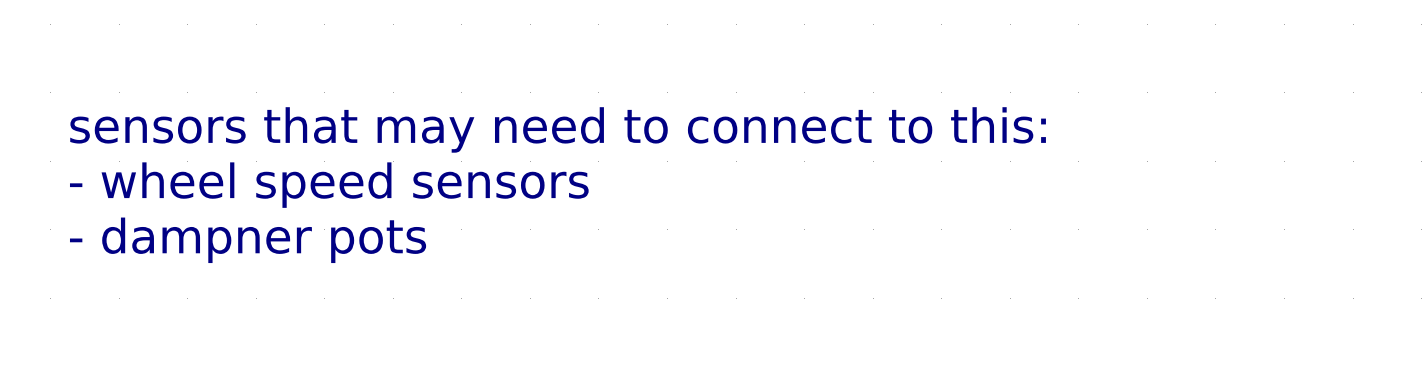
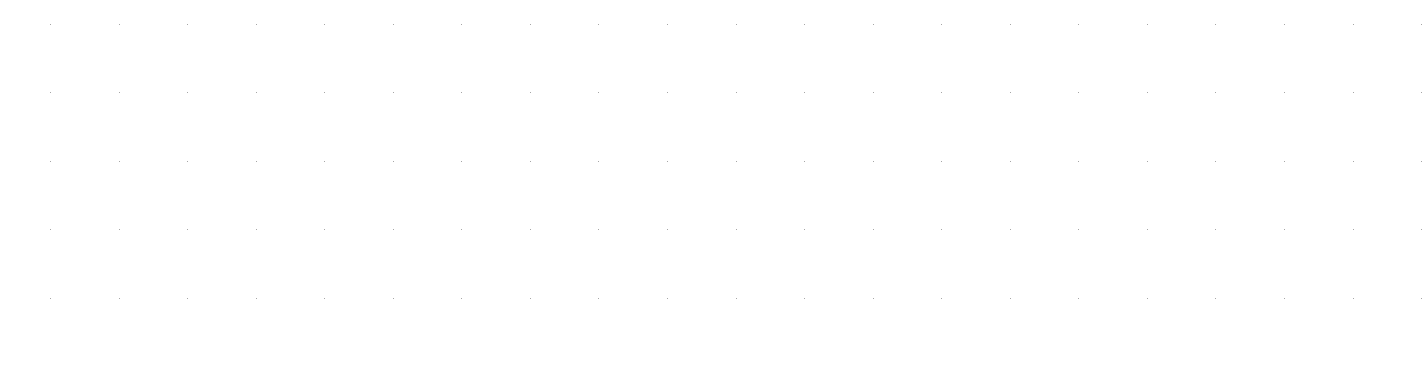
text: sensors that may need to connect to this: (558, 129) -> none
text: - wheel speed sensors (329, 185) -> none
text: - dampner pots (248, 240) -> none

